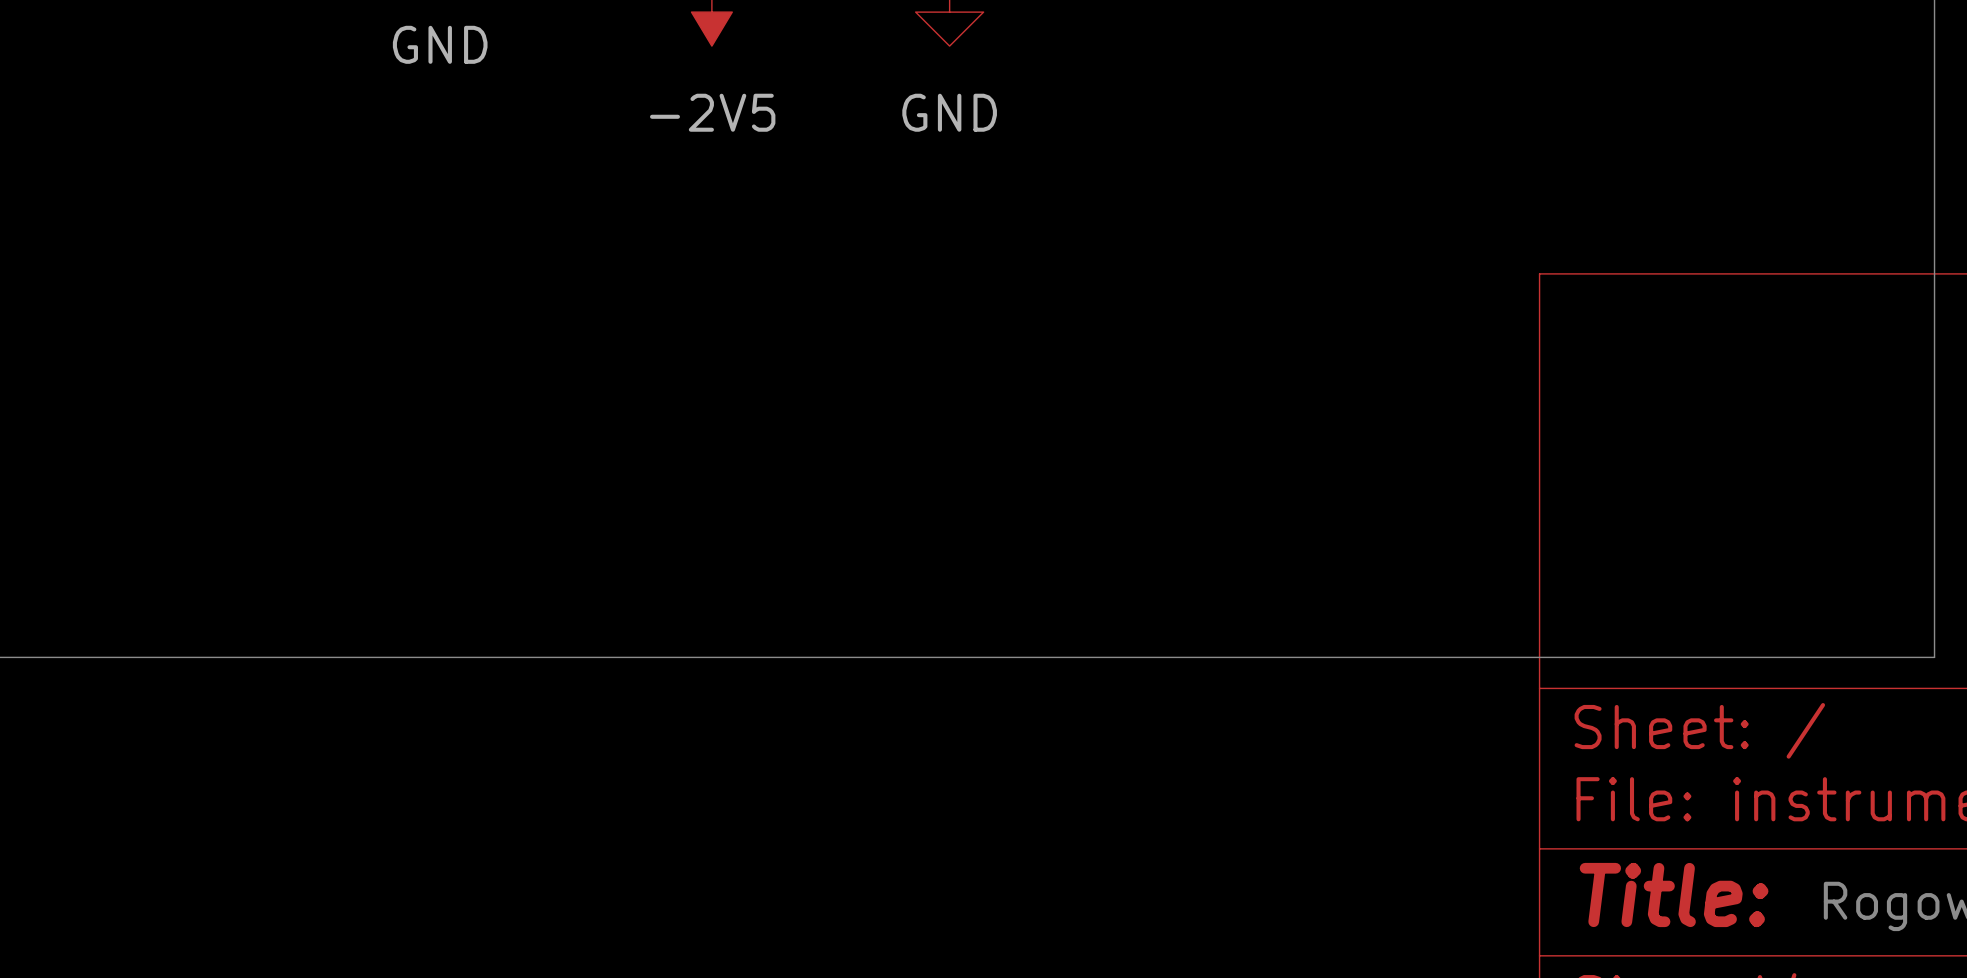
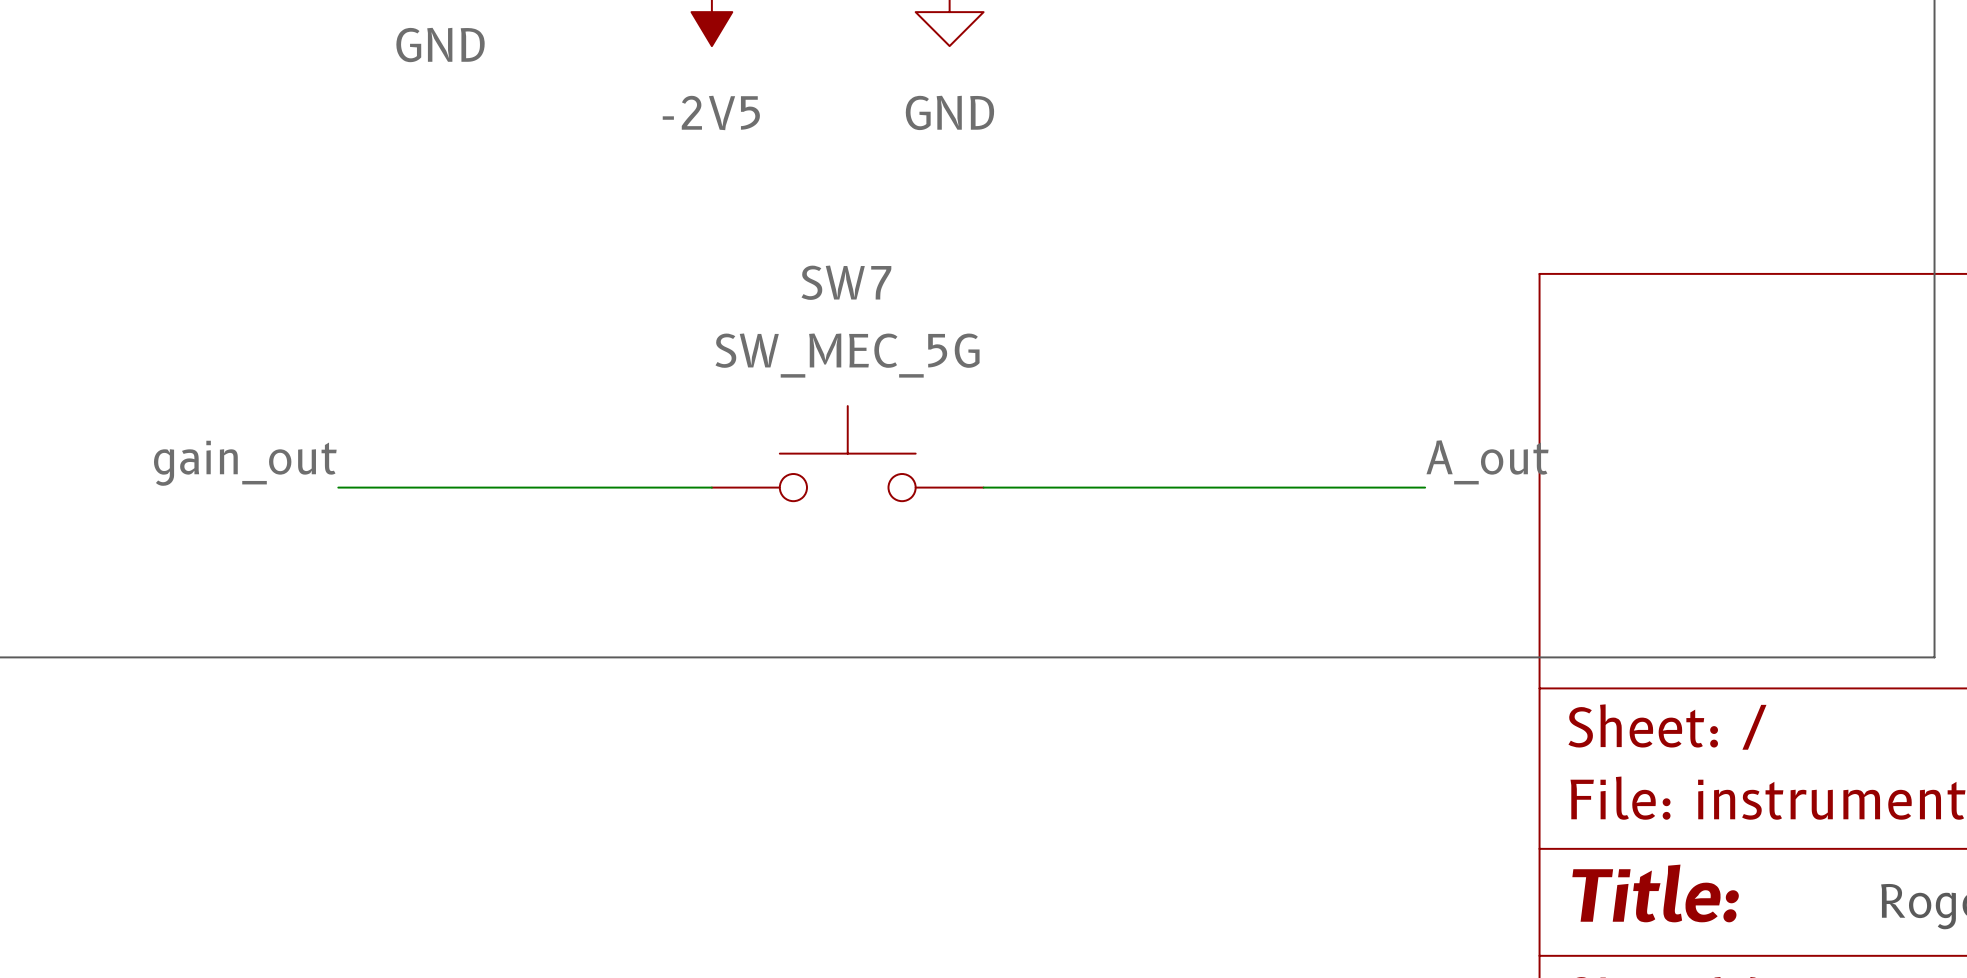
SW7: none -> SW_MEC_5G (847, 453)
label: none -> A_out (1487, 462)
label: none -> gain_out (245, 463)
wire: none -> (338, 487) (711, 487)
wire: none -> (983, 487) (1425, 487)

